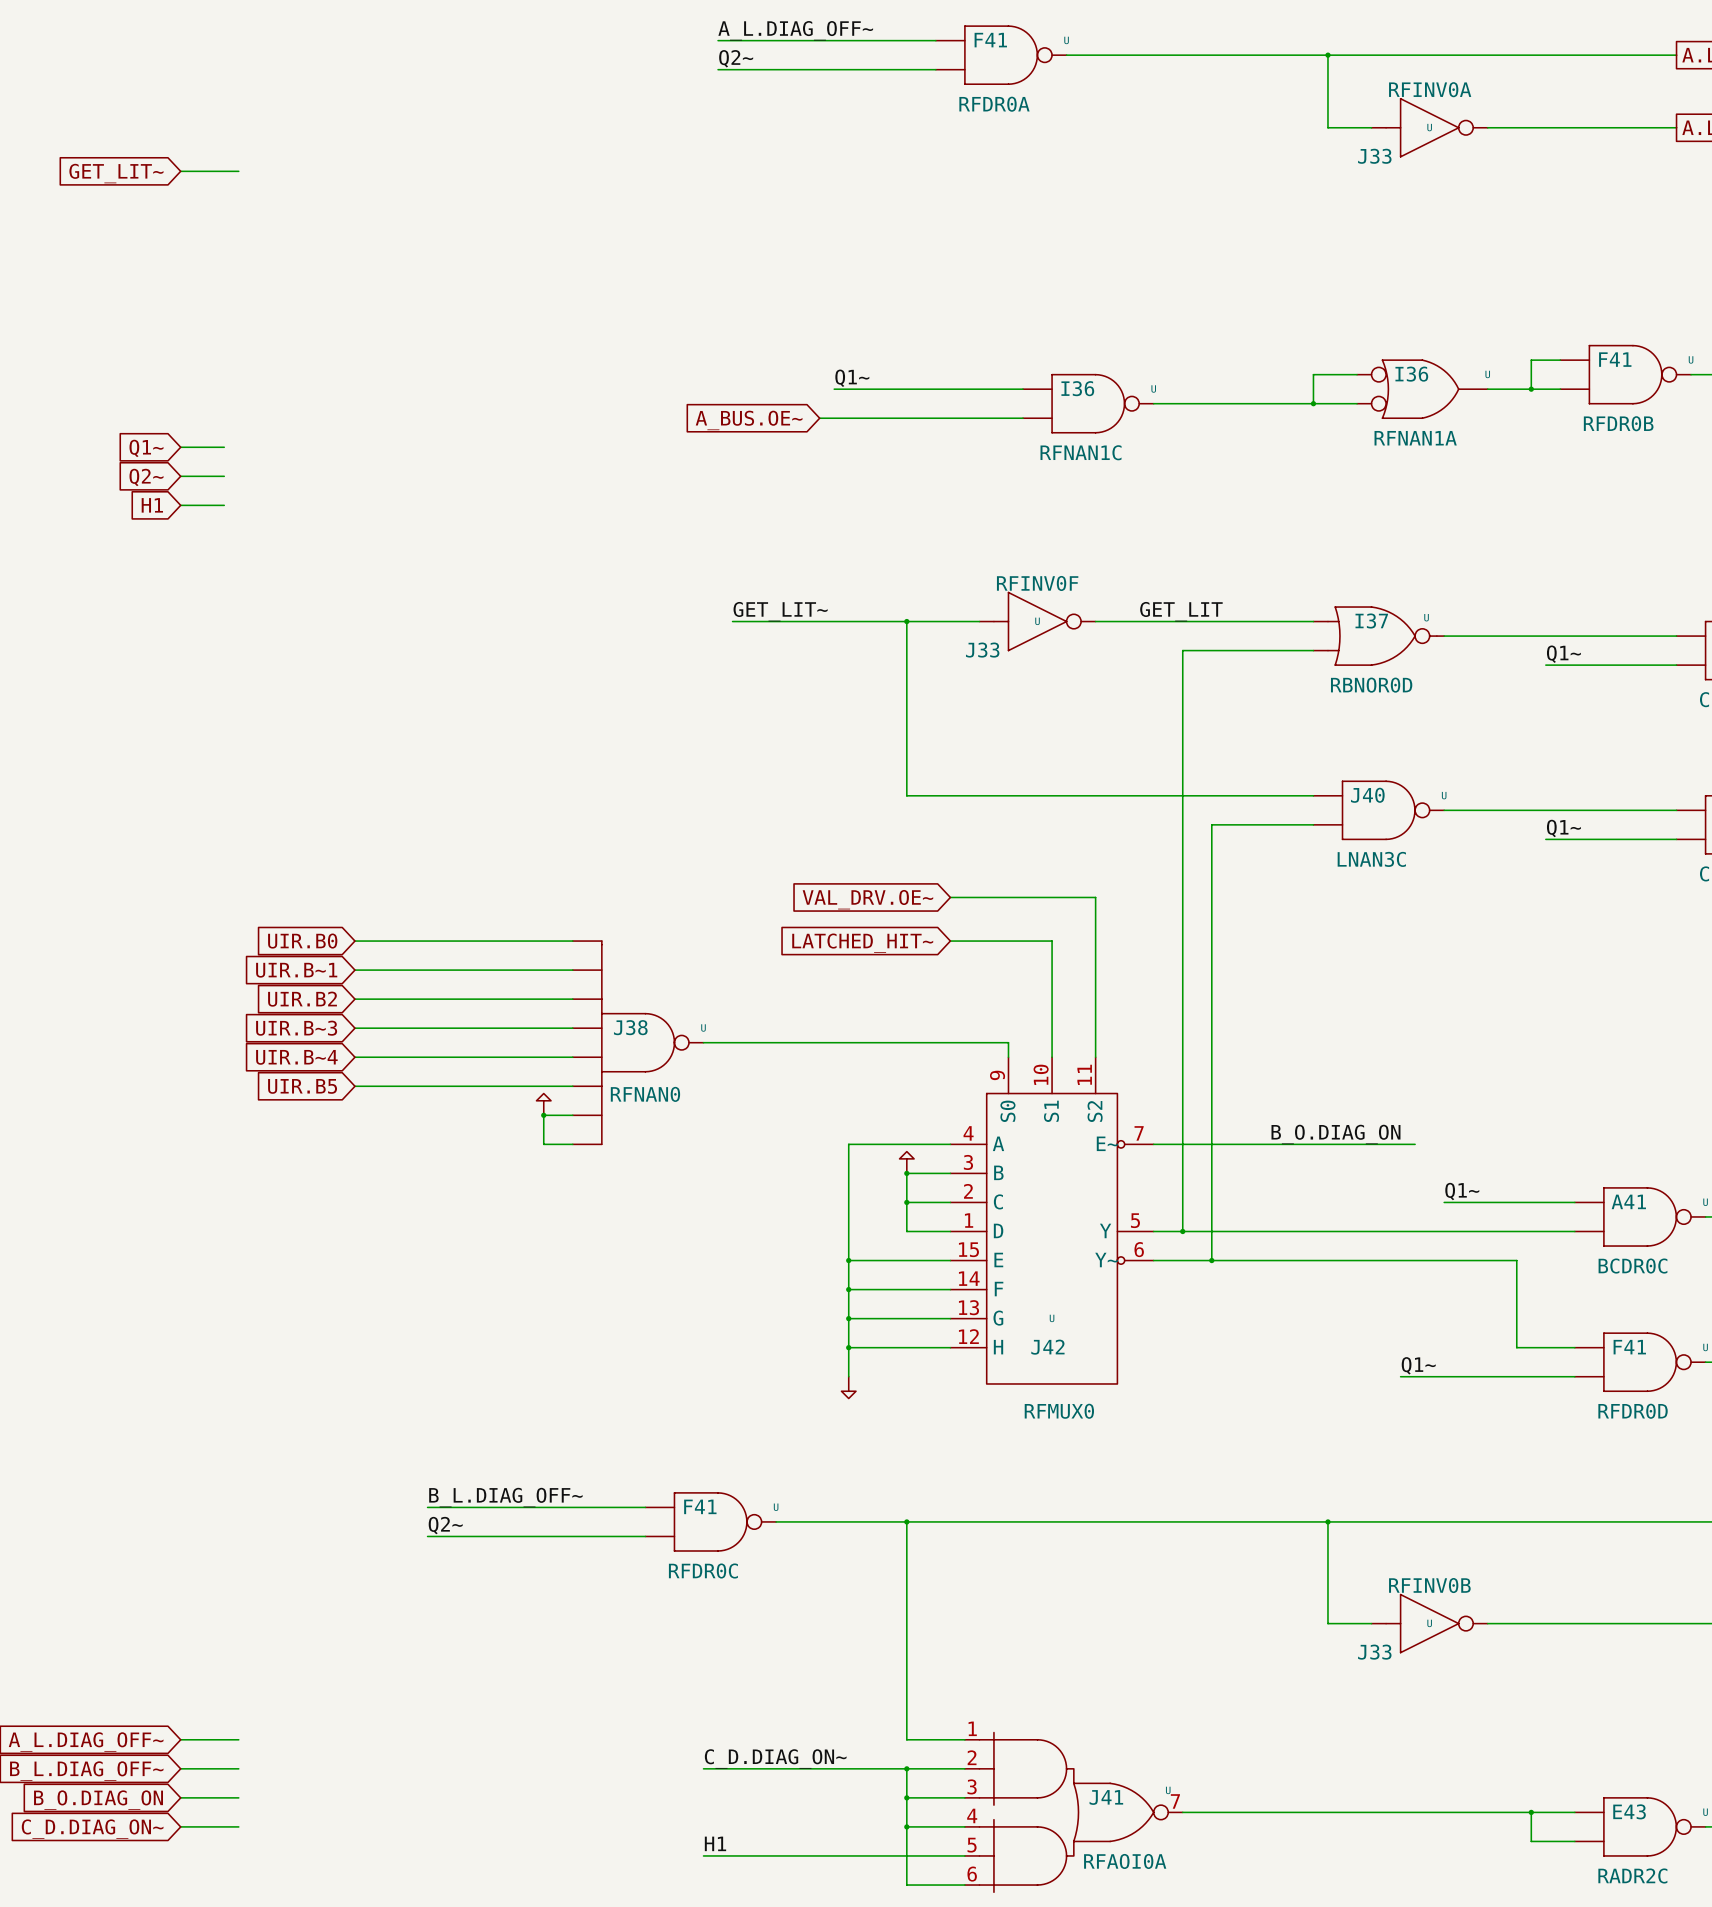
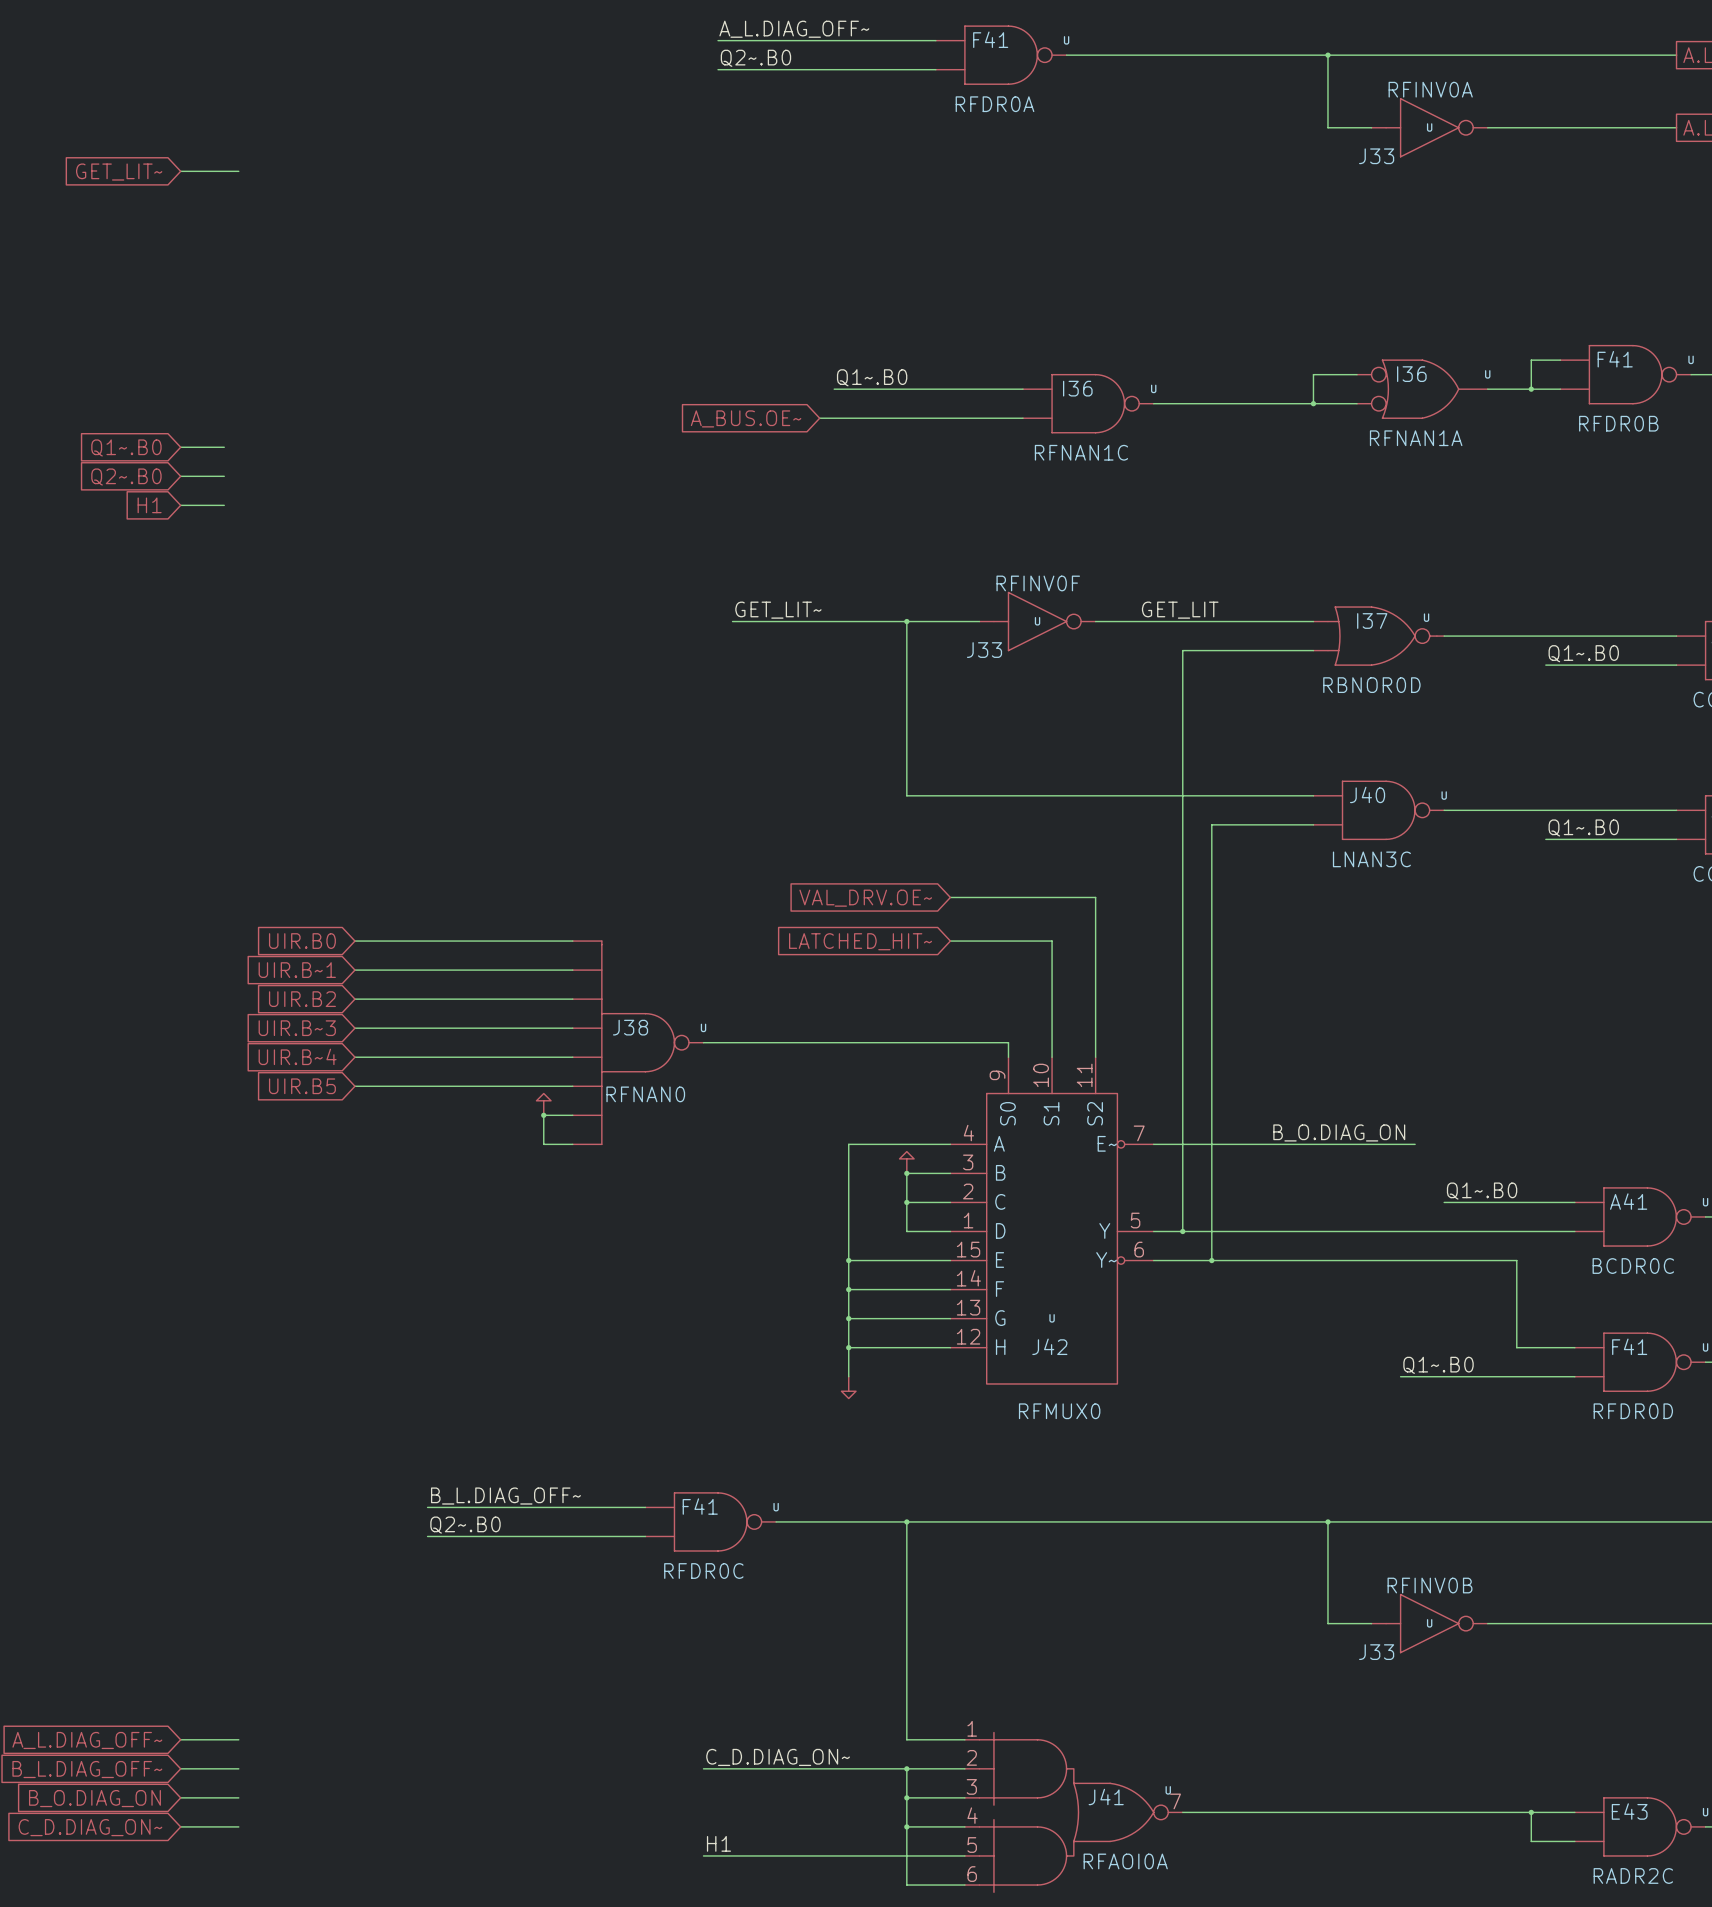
label: Q2~ (736, 58) -> Q2~.B0 (755, 58)
label: Q1~ (852, 378) -> Q1~.B0 (872, 377)
global label: Q1~ (146, 448) -> Q1~.B0 (126, 447)
global label: Q2~ (146, 477) -> Q2~.B0 (126, 477)
label: Q1~ (1563, 654) -> Q1~.B0 (1583, 653)
label: Q1~ (1563, 828) -> Q1~.B0 (1583, 827)
label: Q1~ (1462, 1191) -> Q1~.B0 (1482, 1191)
label: Q1~ (1418, 1365) -> Q1~.B0 (1438, 1365)
label: Q2~ (445, 1525) -> Q2~.B0 (465, 1525)

